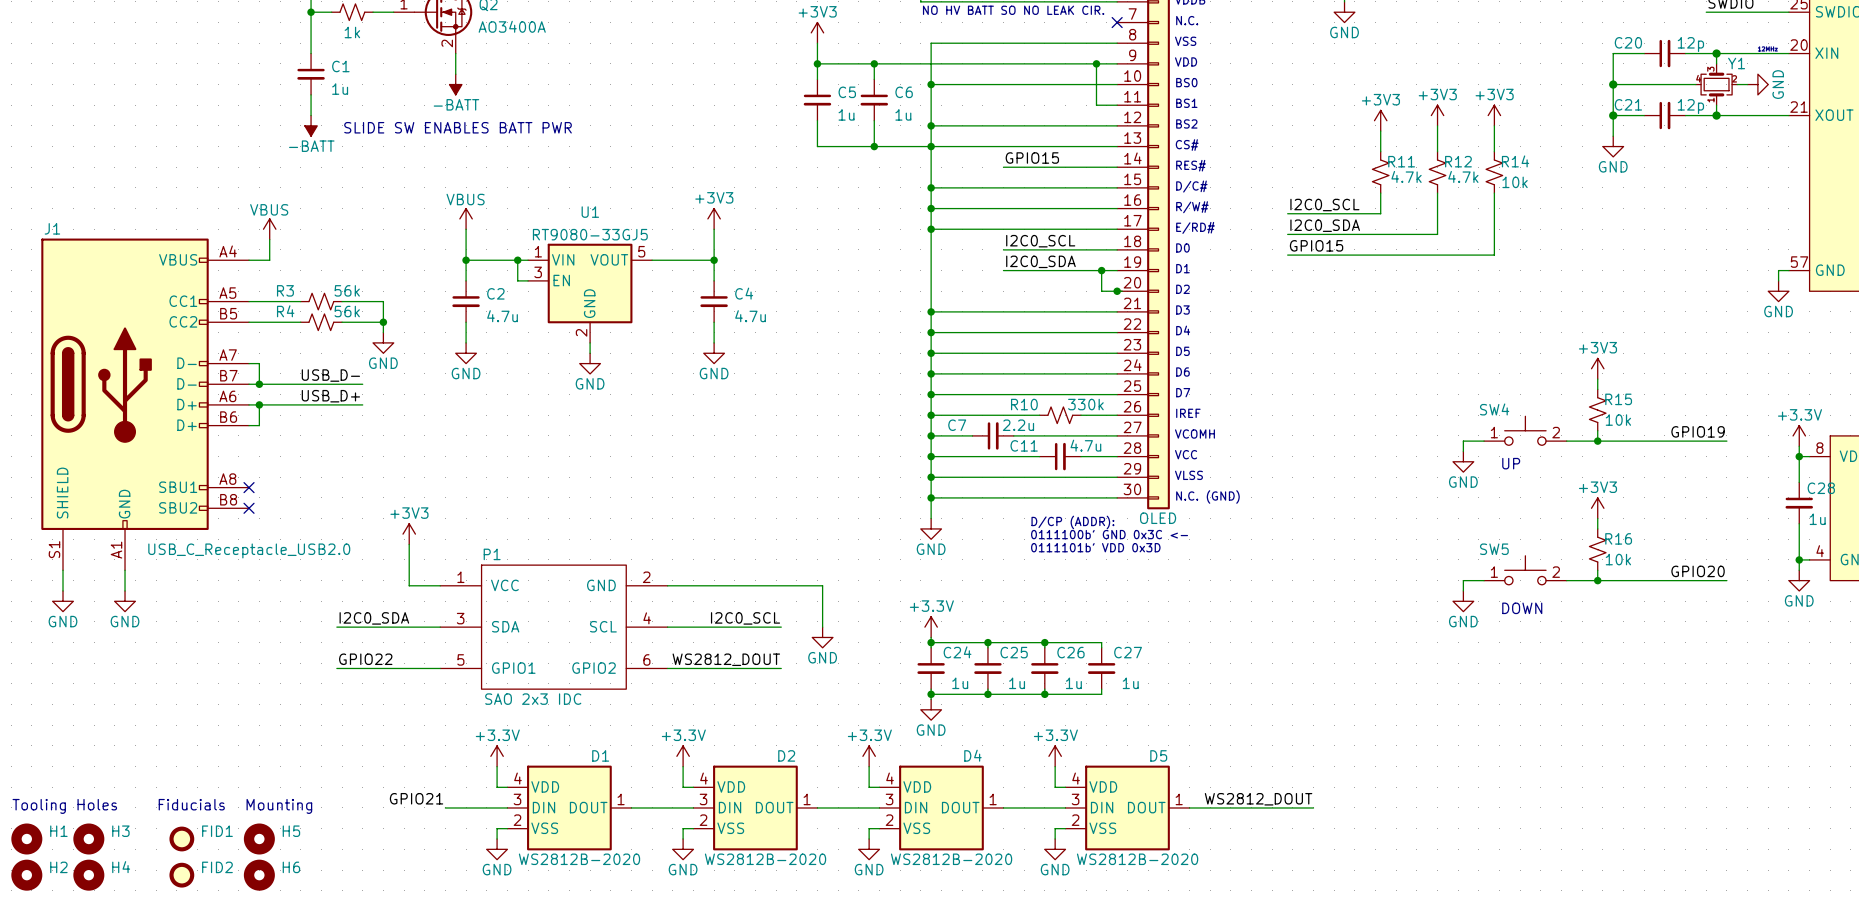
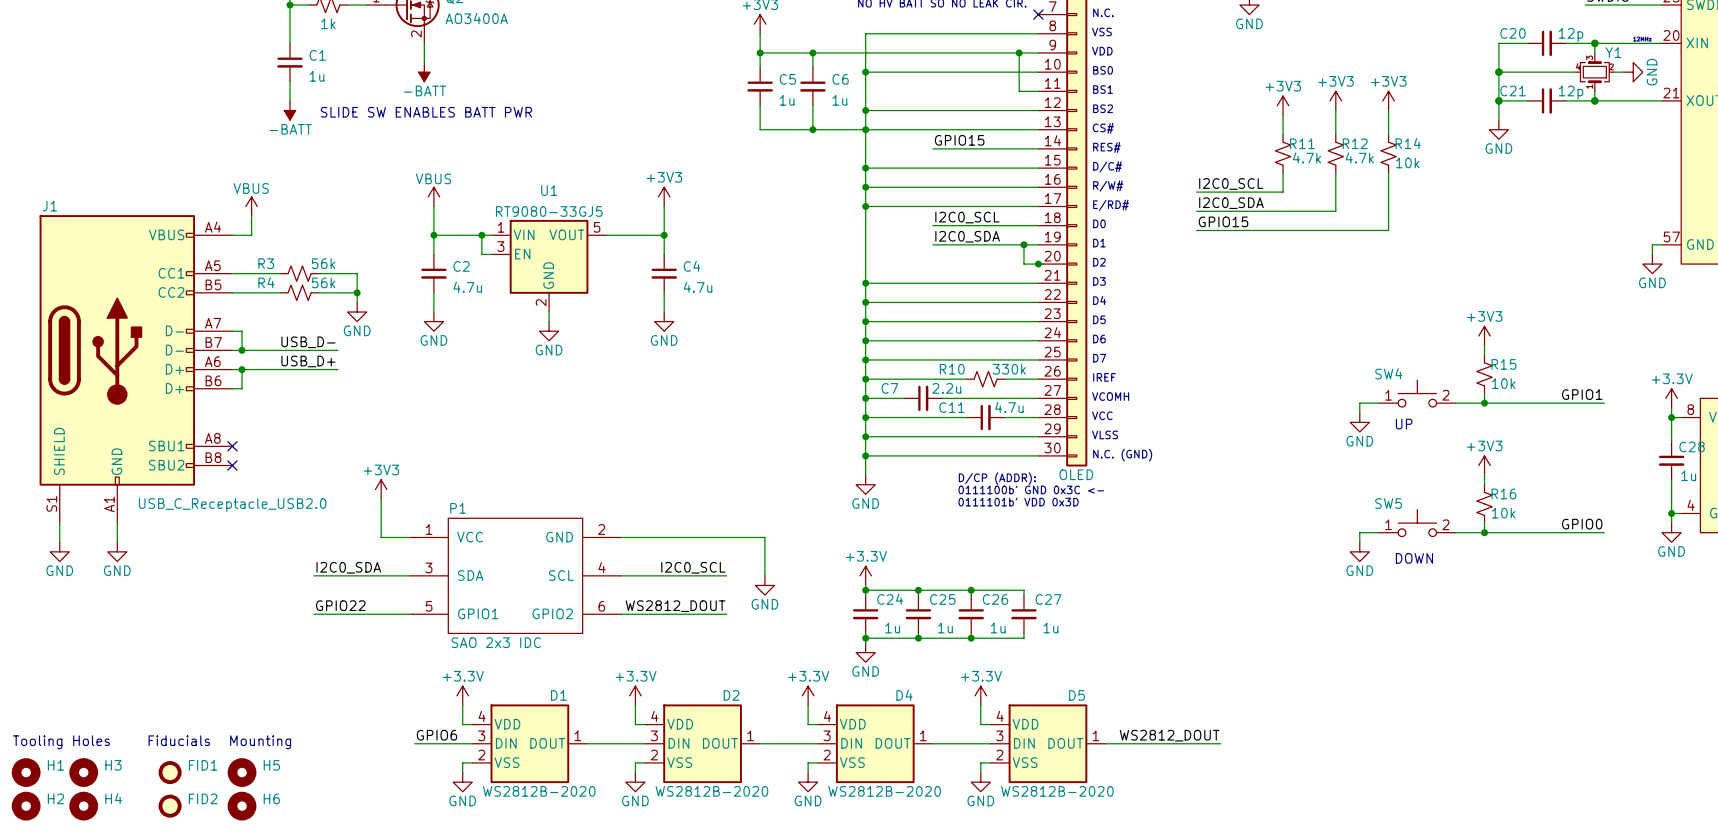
label: GPIO19 (1698, 431) -> GPIO1 (1582, 394)
label: GPIO20 (1698, 571) -> GPIO0 (1582, 524)
label: GPIO21 (416, 798) -> GPIO6 (436, 735)

